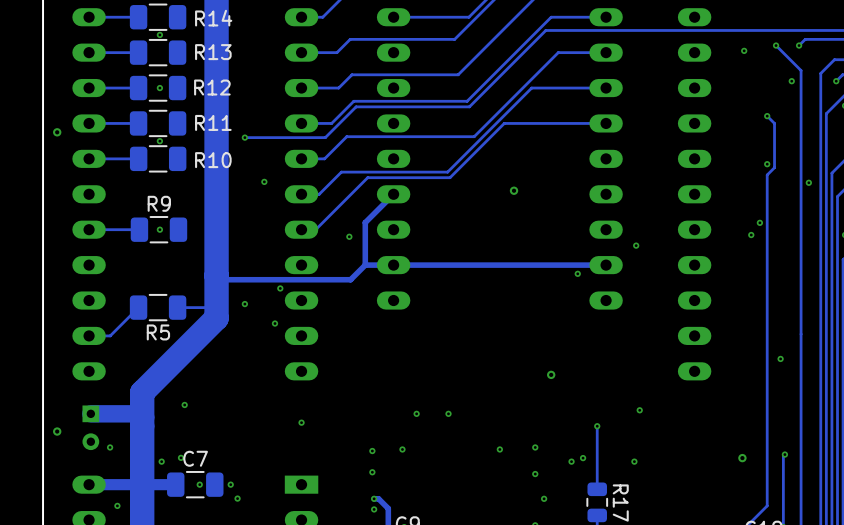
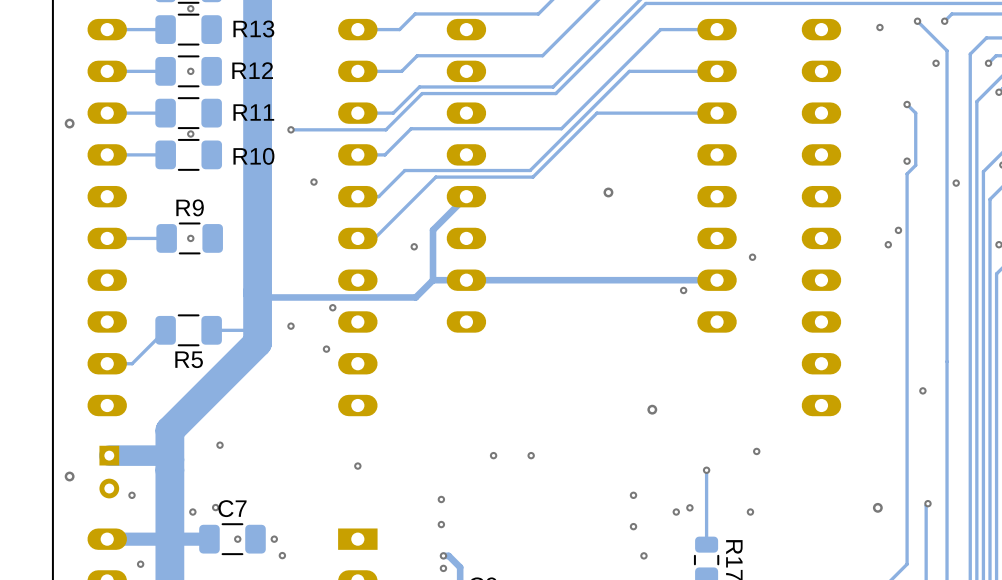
via: (402, 449) -> none
via: (499, 449) -> none

